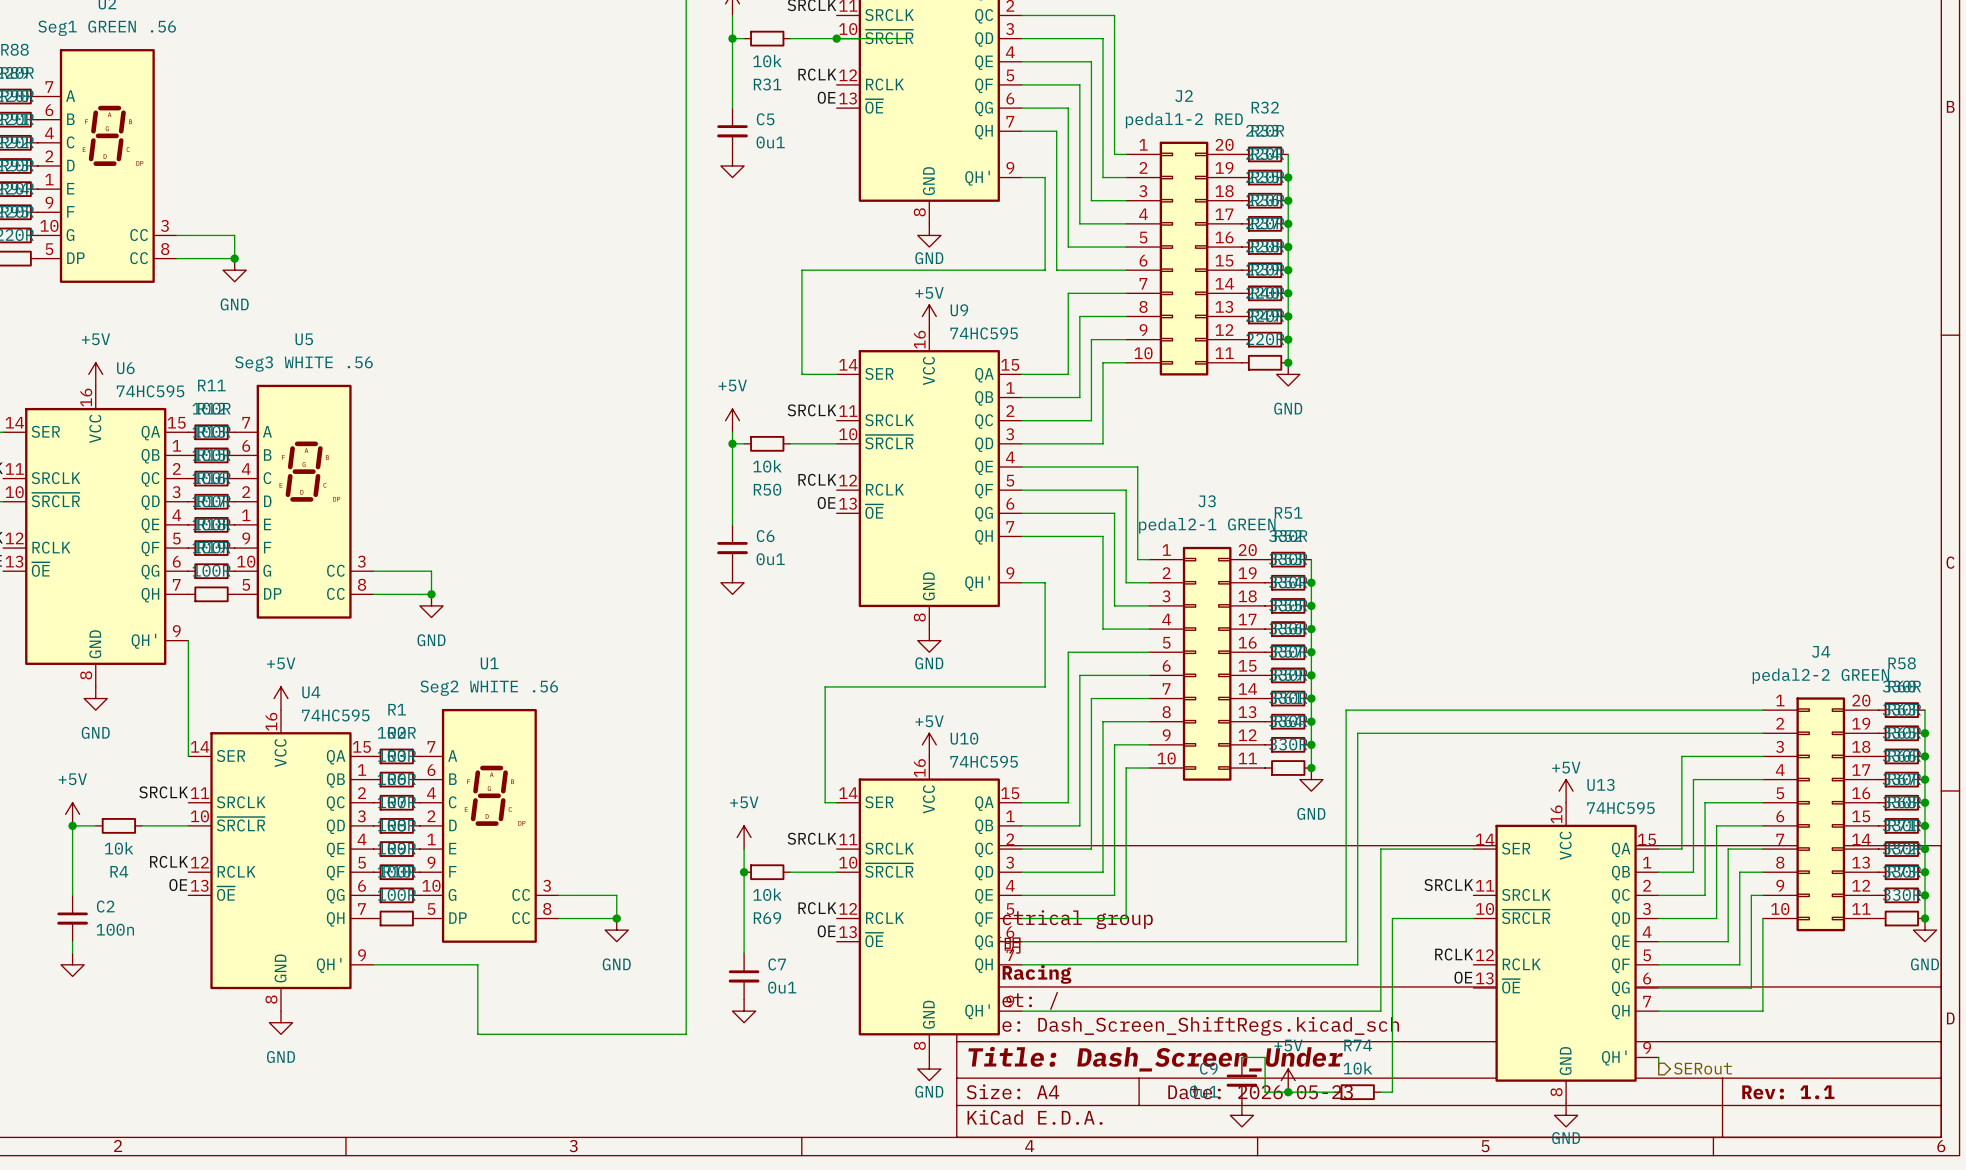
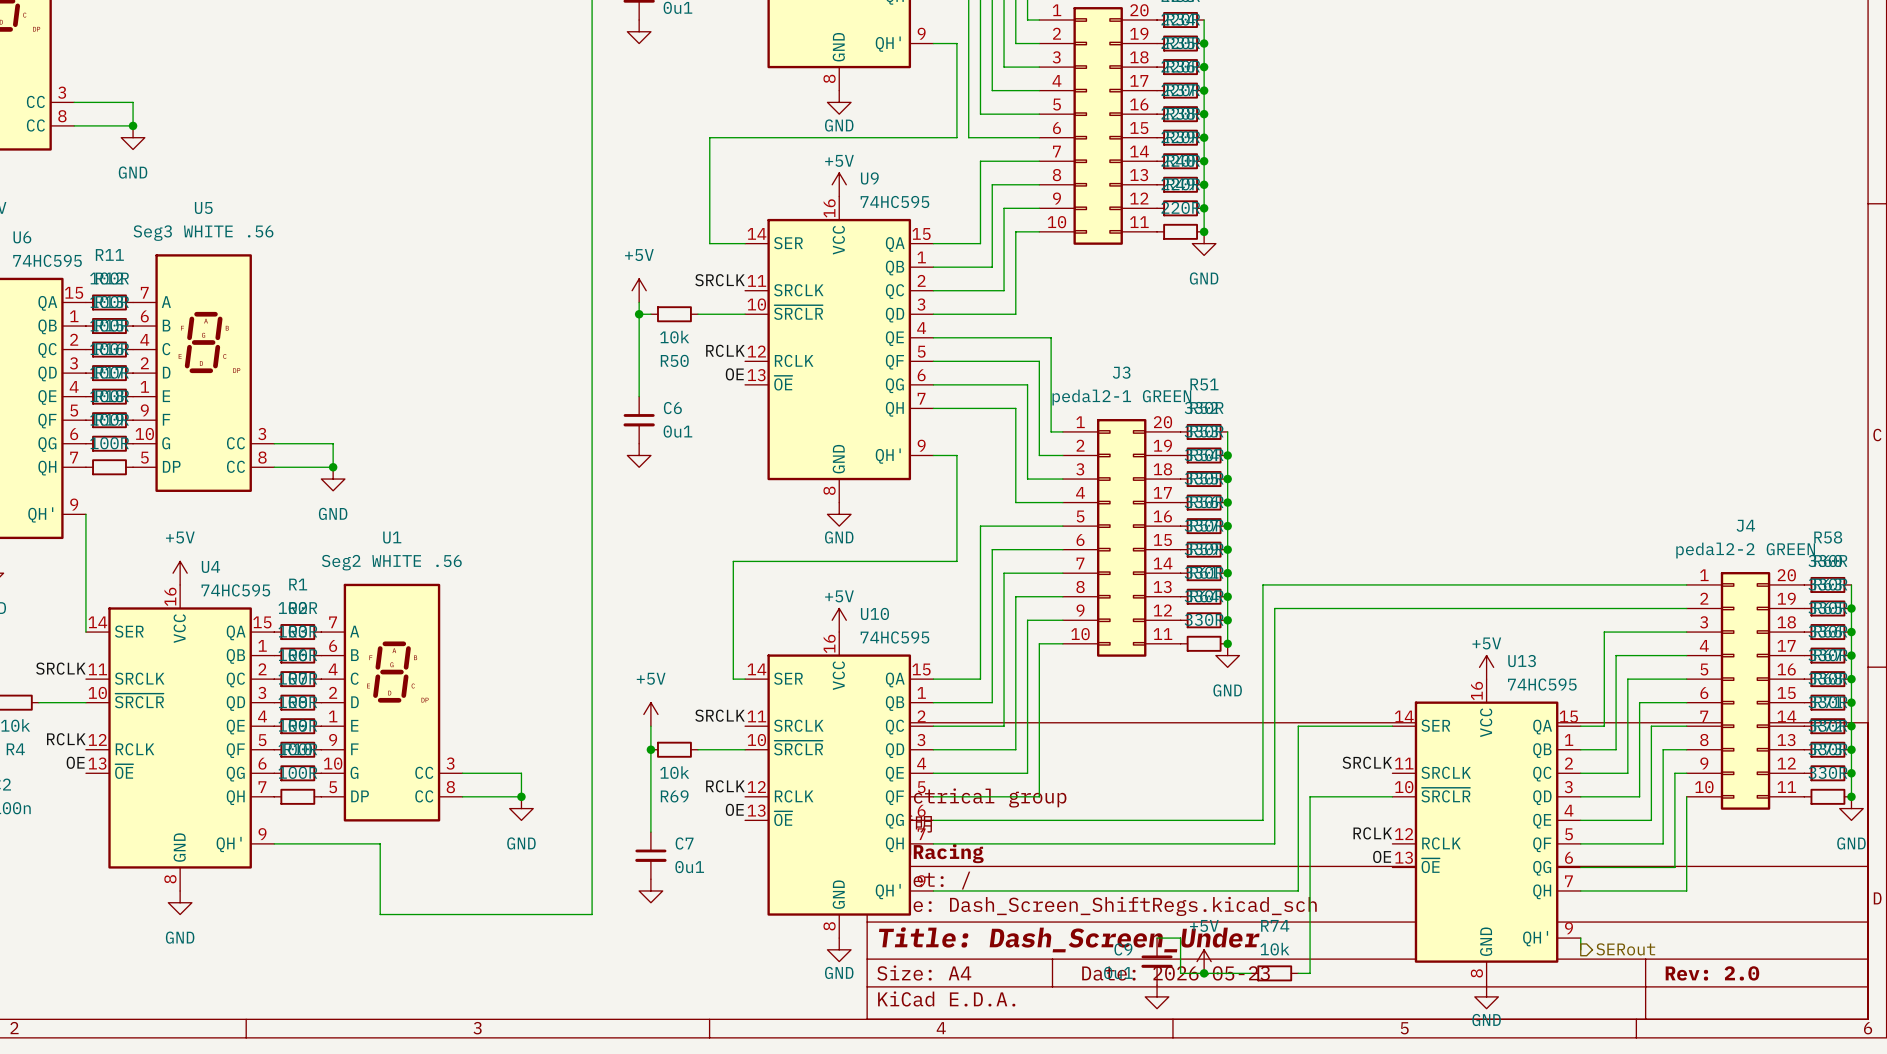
title block: Rev: 1.1 (1788, 1092) -> Rev: 2.0 (1712, 973)

